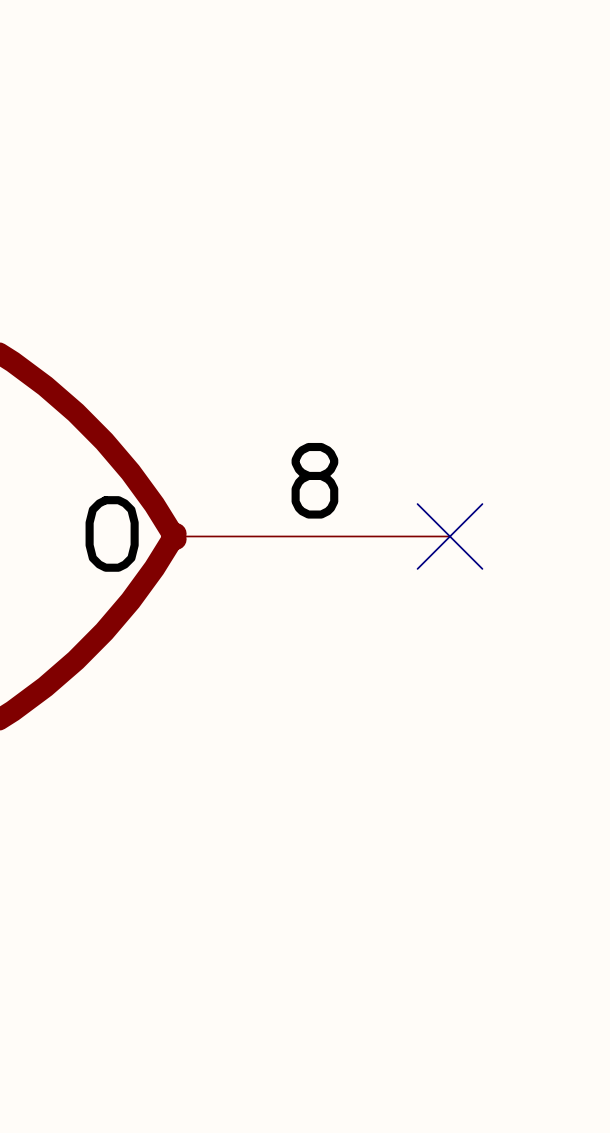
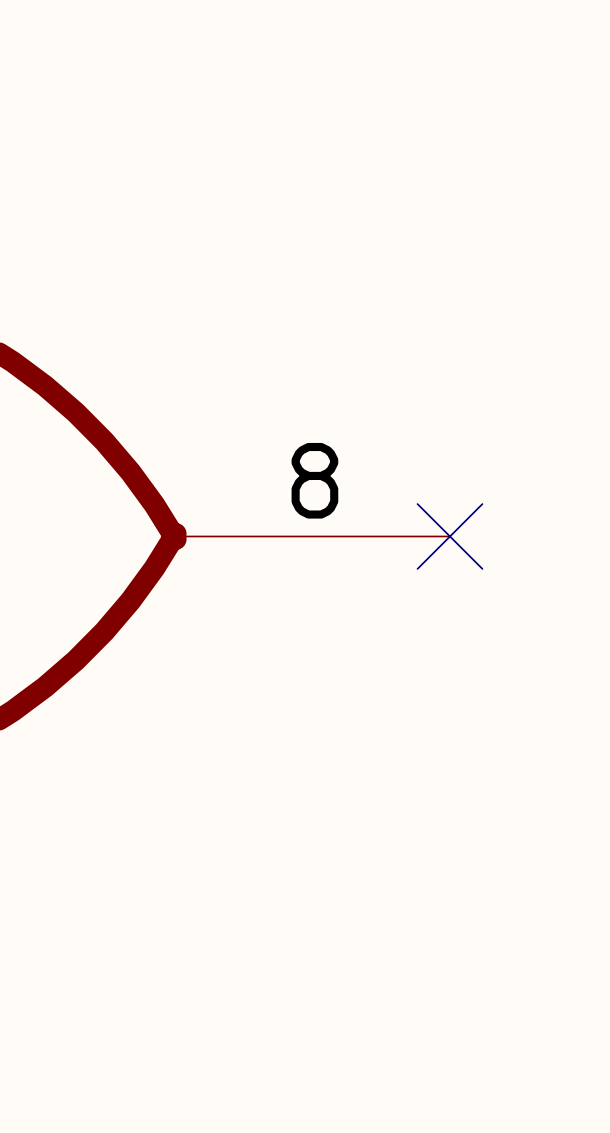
part pin name: O (112, 533) -> none

